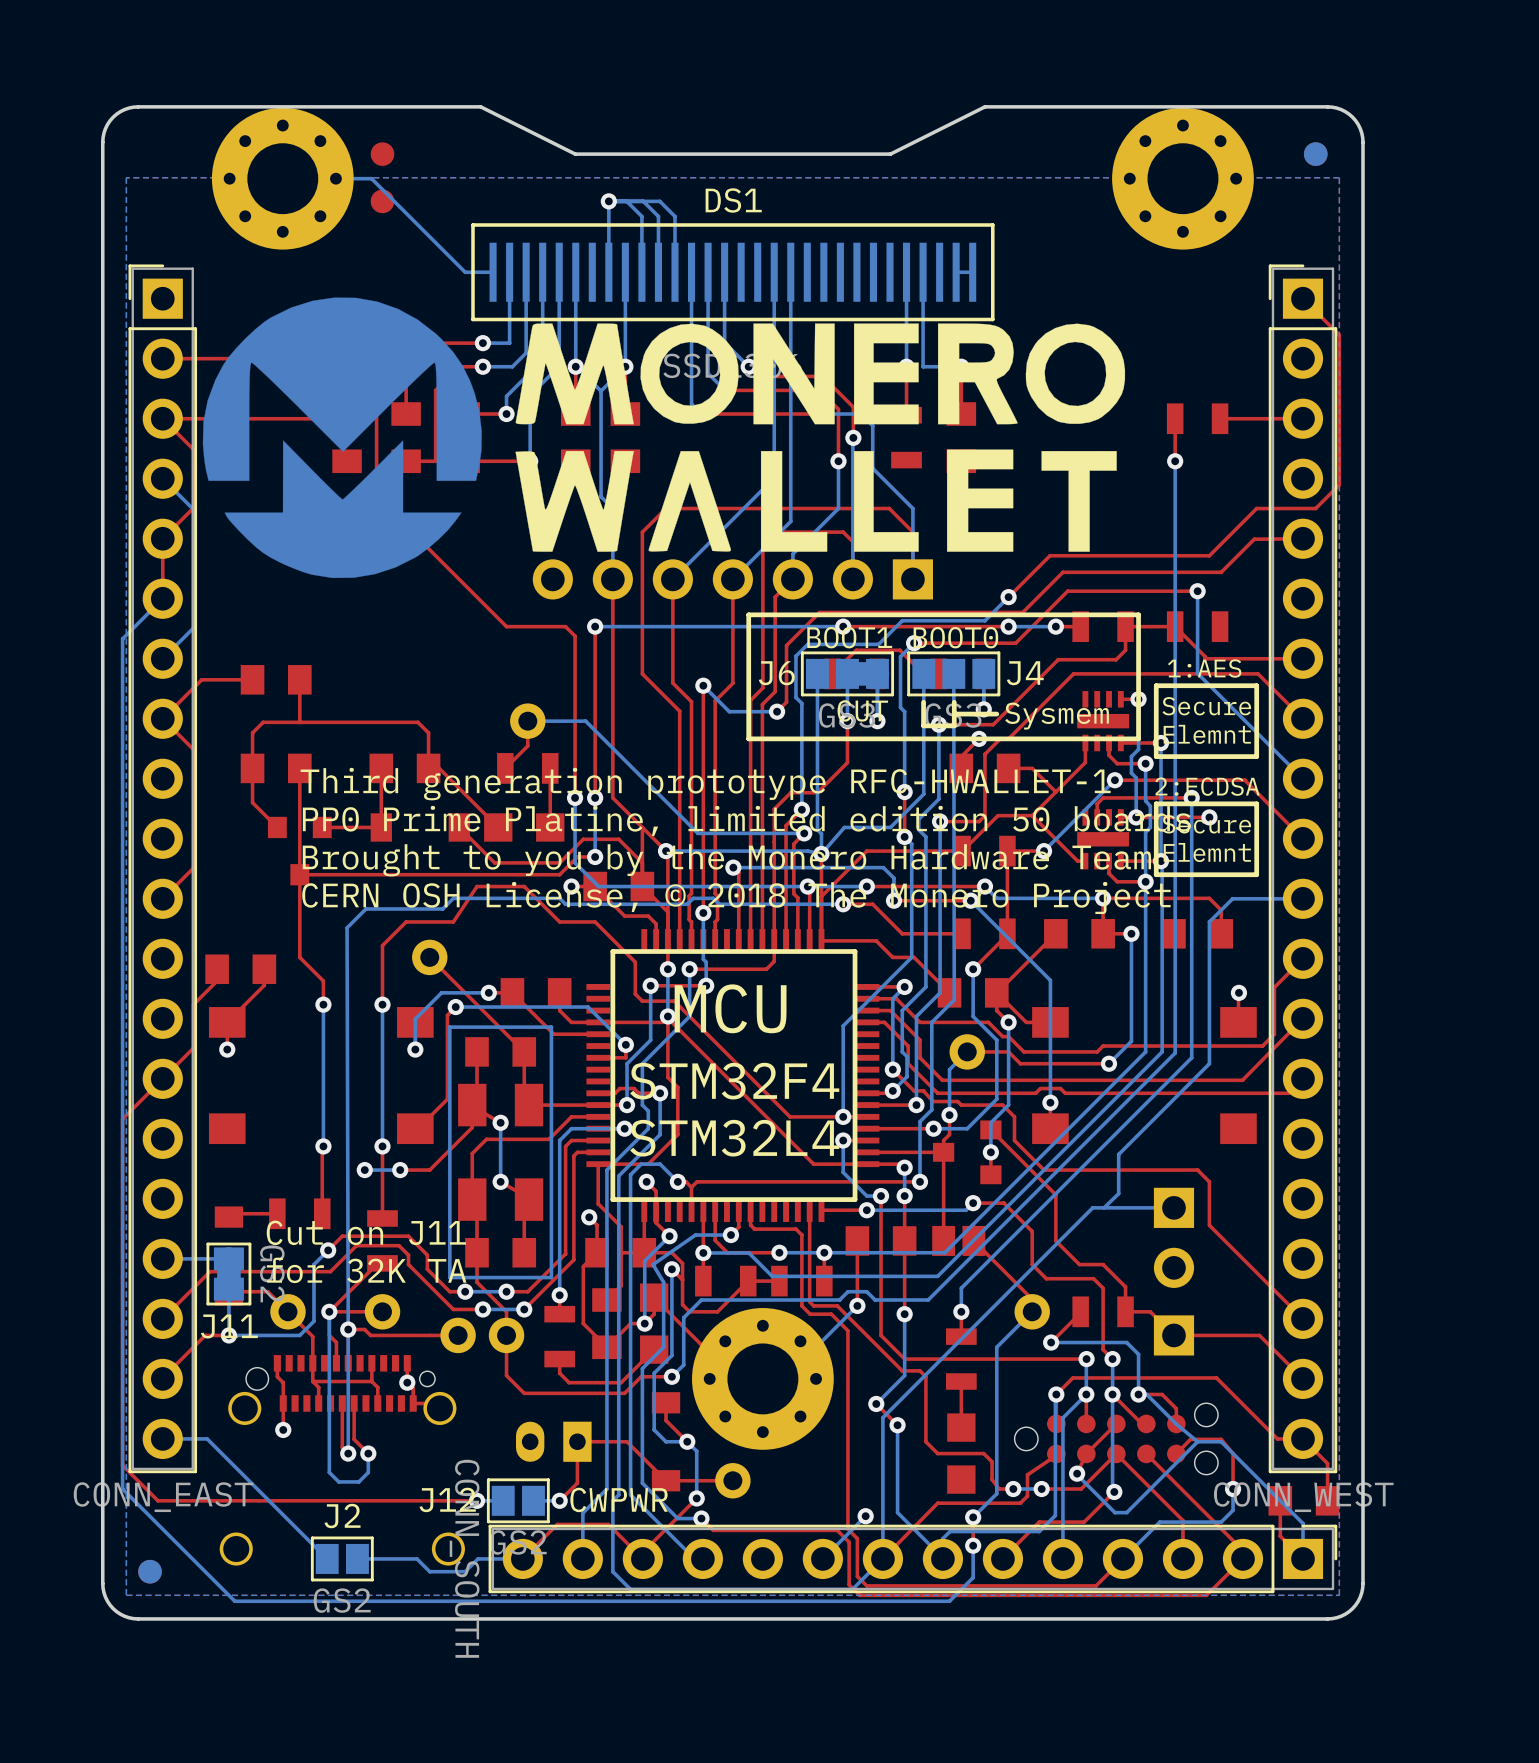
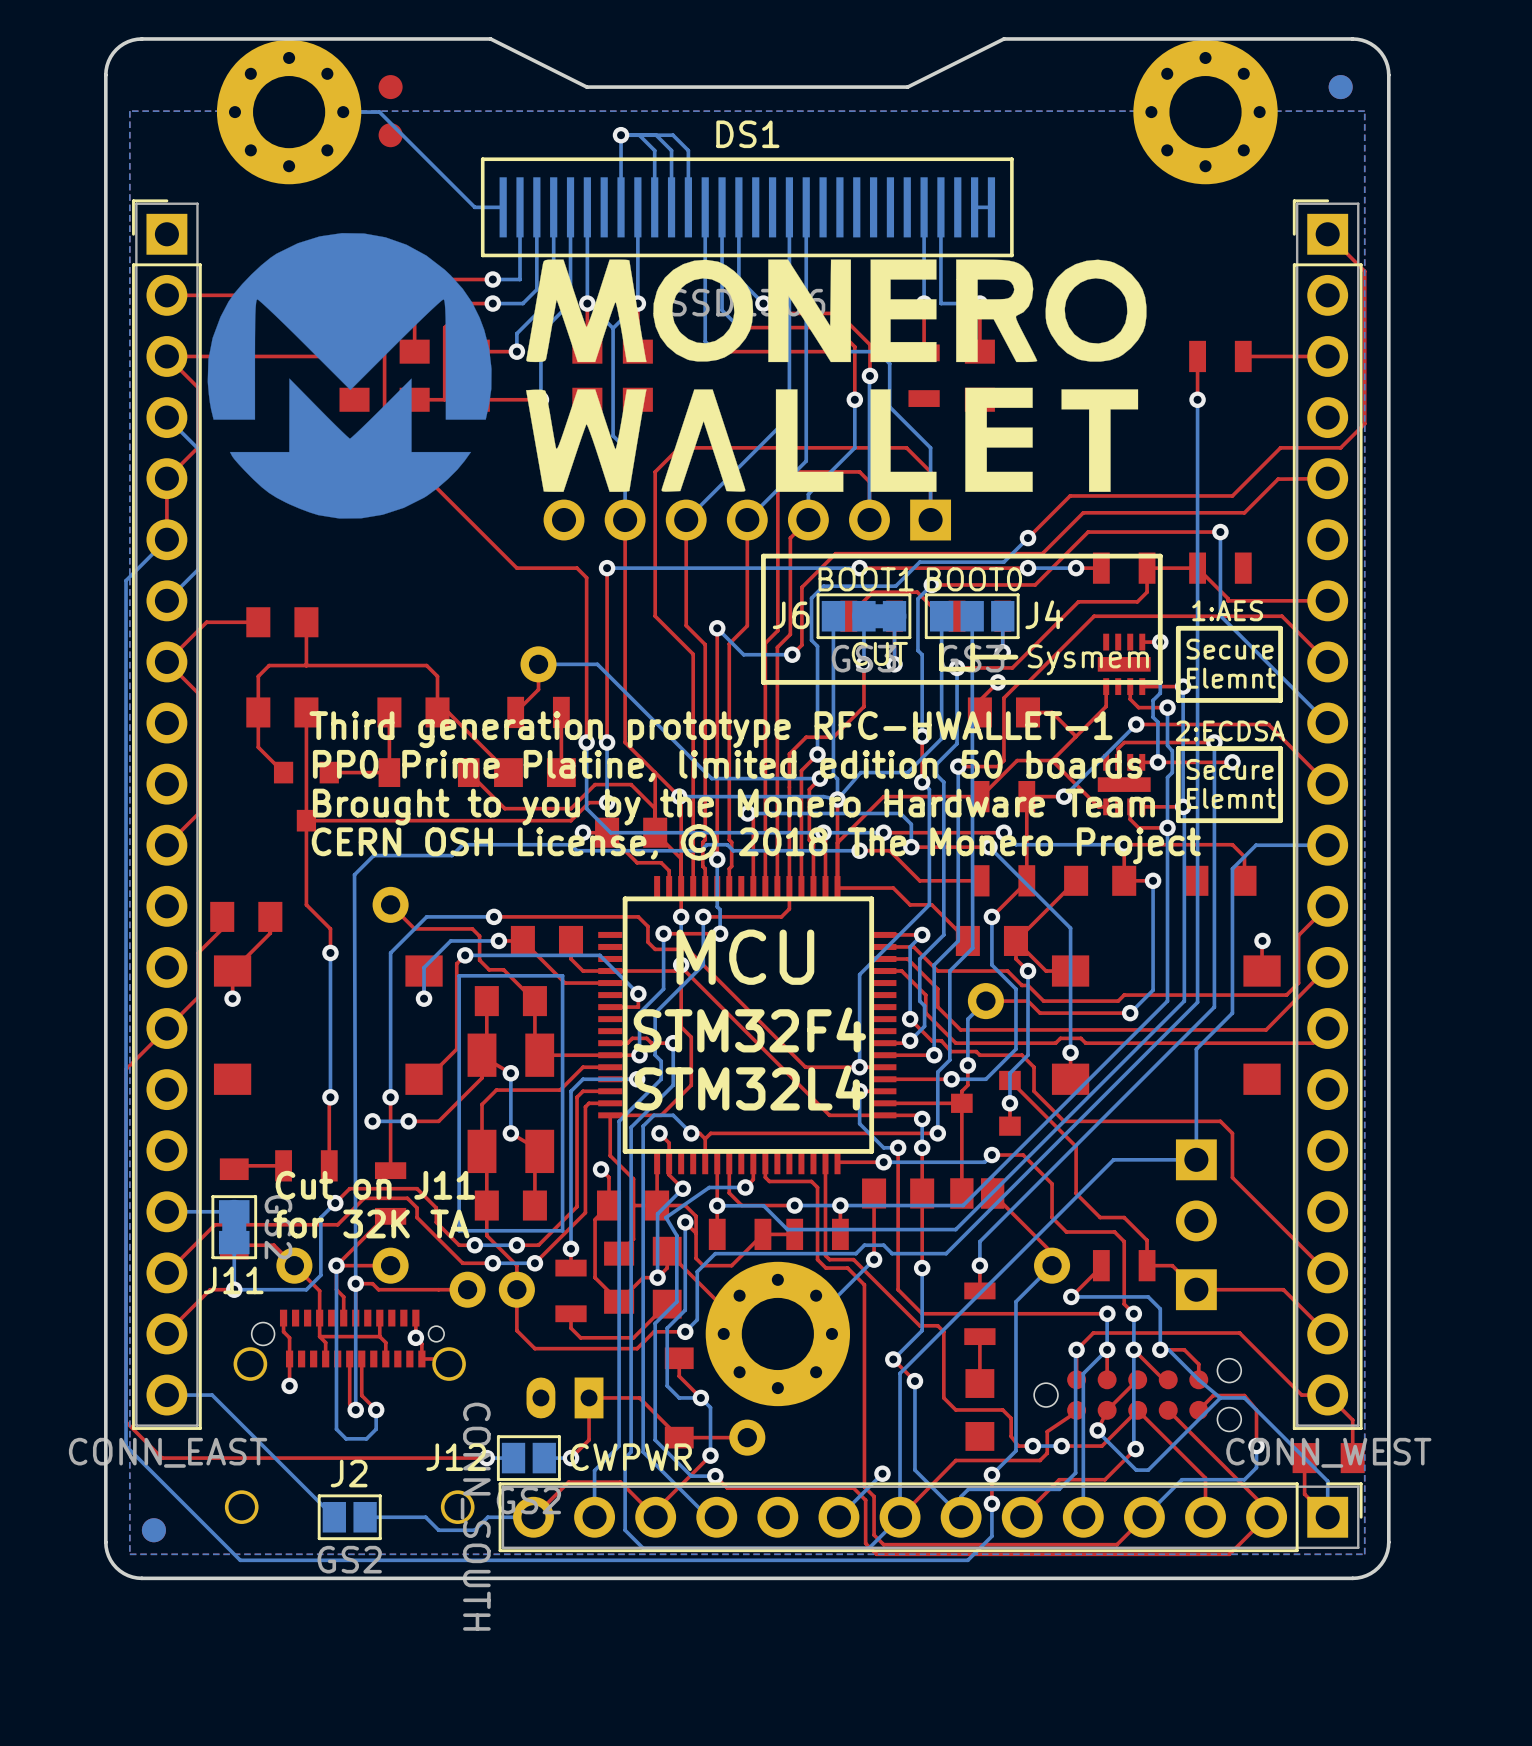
top track: (429, 957) (493, 1021) -> (390, 904) (414, 928) (472, 928) (479, 936) (479, 960) (489, 969) (503, 969)
part position: (429, 957) -> (390, 904)
bottom track: none -> (494, 916) (426, 916) (390, 952)
top track: (635, 978) (635, 962) (595, 921) (559, 921) (524, 886) (477, 886) (453, 921) (406, 921) (382, 945) (382, 1004) -> (647, 926) (638, 916) (494, 916)
via position: (382, 1004) -> (494, 916)
bottom track: (1173, 1099) (1118, 1154) (1118, 1193) (1104, 1207) -> (1196, 1049) (1196, 1159)

